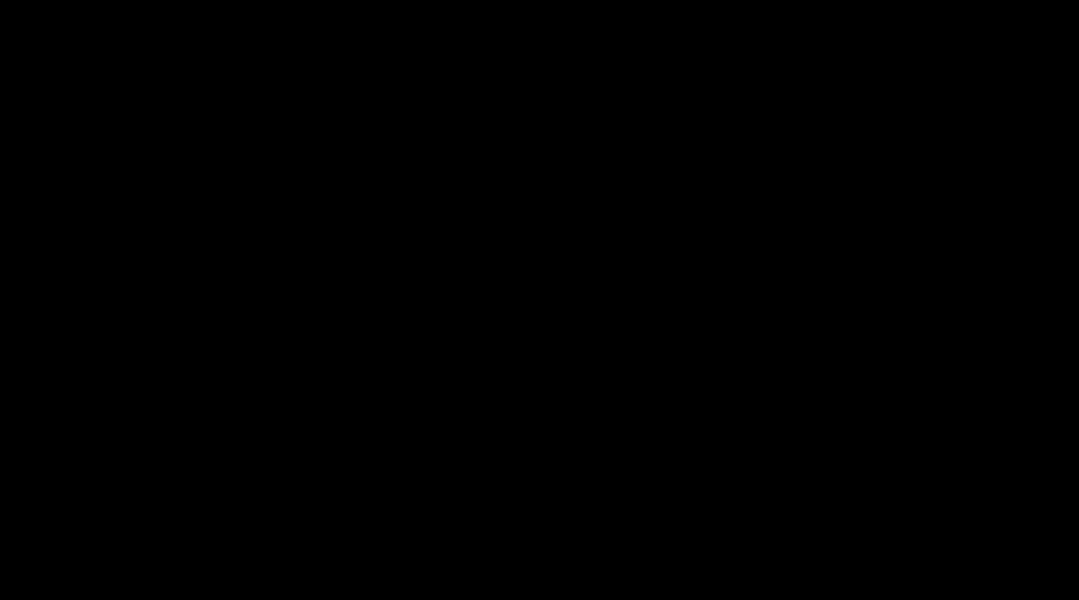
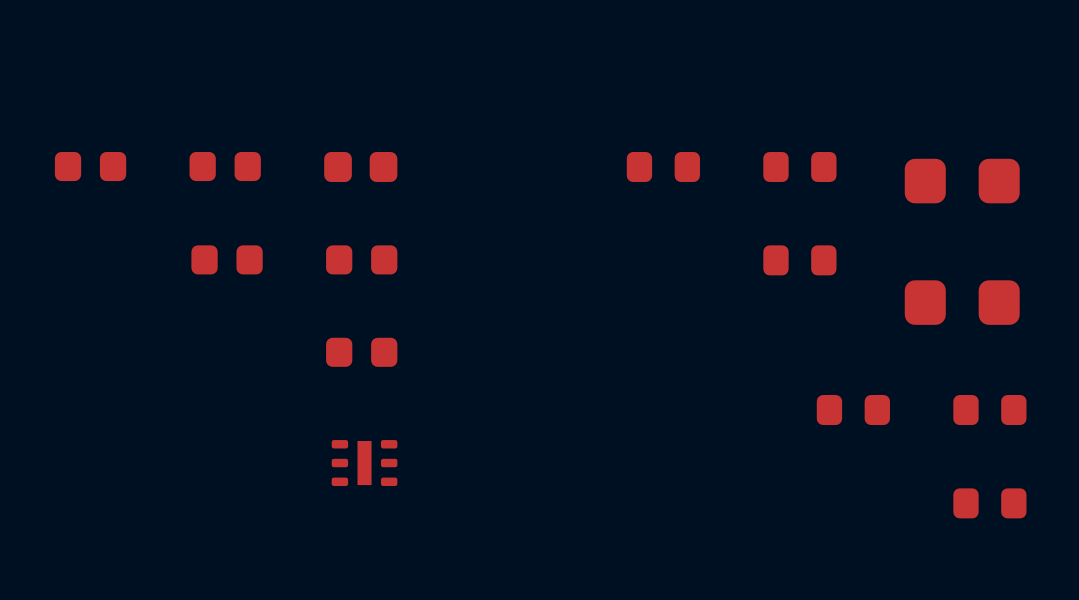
part: none -> (90, 166)
part: none -> (225, 166)
part: none -> (360, 166)
part: none -> (663, 166)
part: none -> (799, 166)
part: none -> (962, 181)
part: none -> (227, 259)
part: none -> (361, 259)
part: none -> (799, 260)
part: none -> (962, 302)
part: none -> (361, 352)
part: none -> (853, 410)
part: none -> (989, 410)
part: none -> (364, 463)
part: none -> (989, 503)

